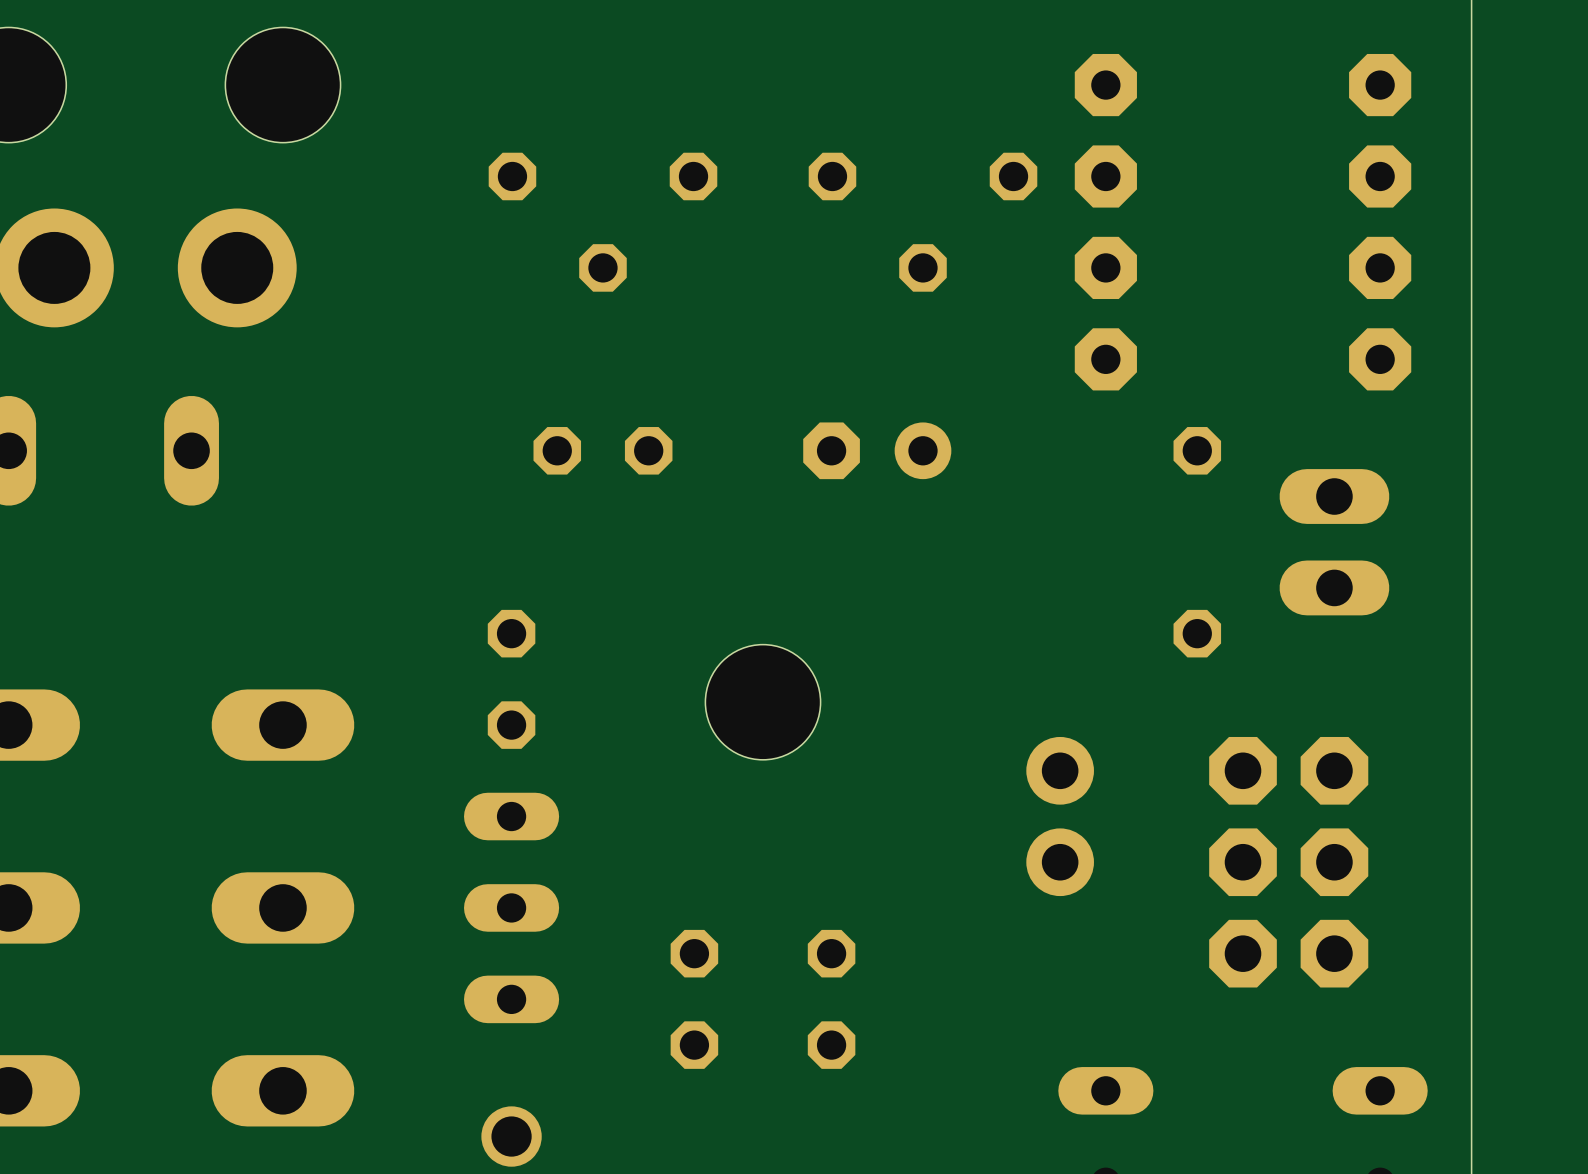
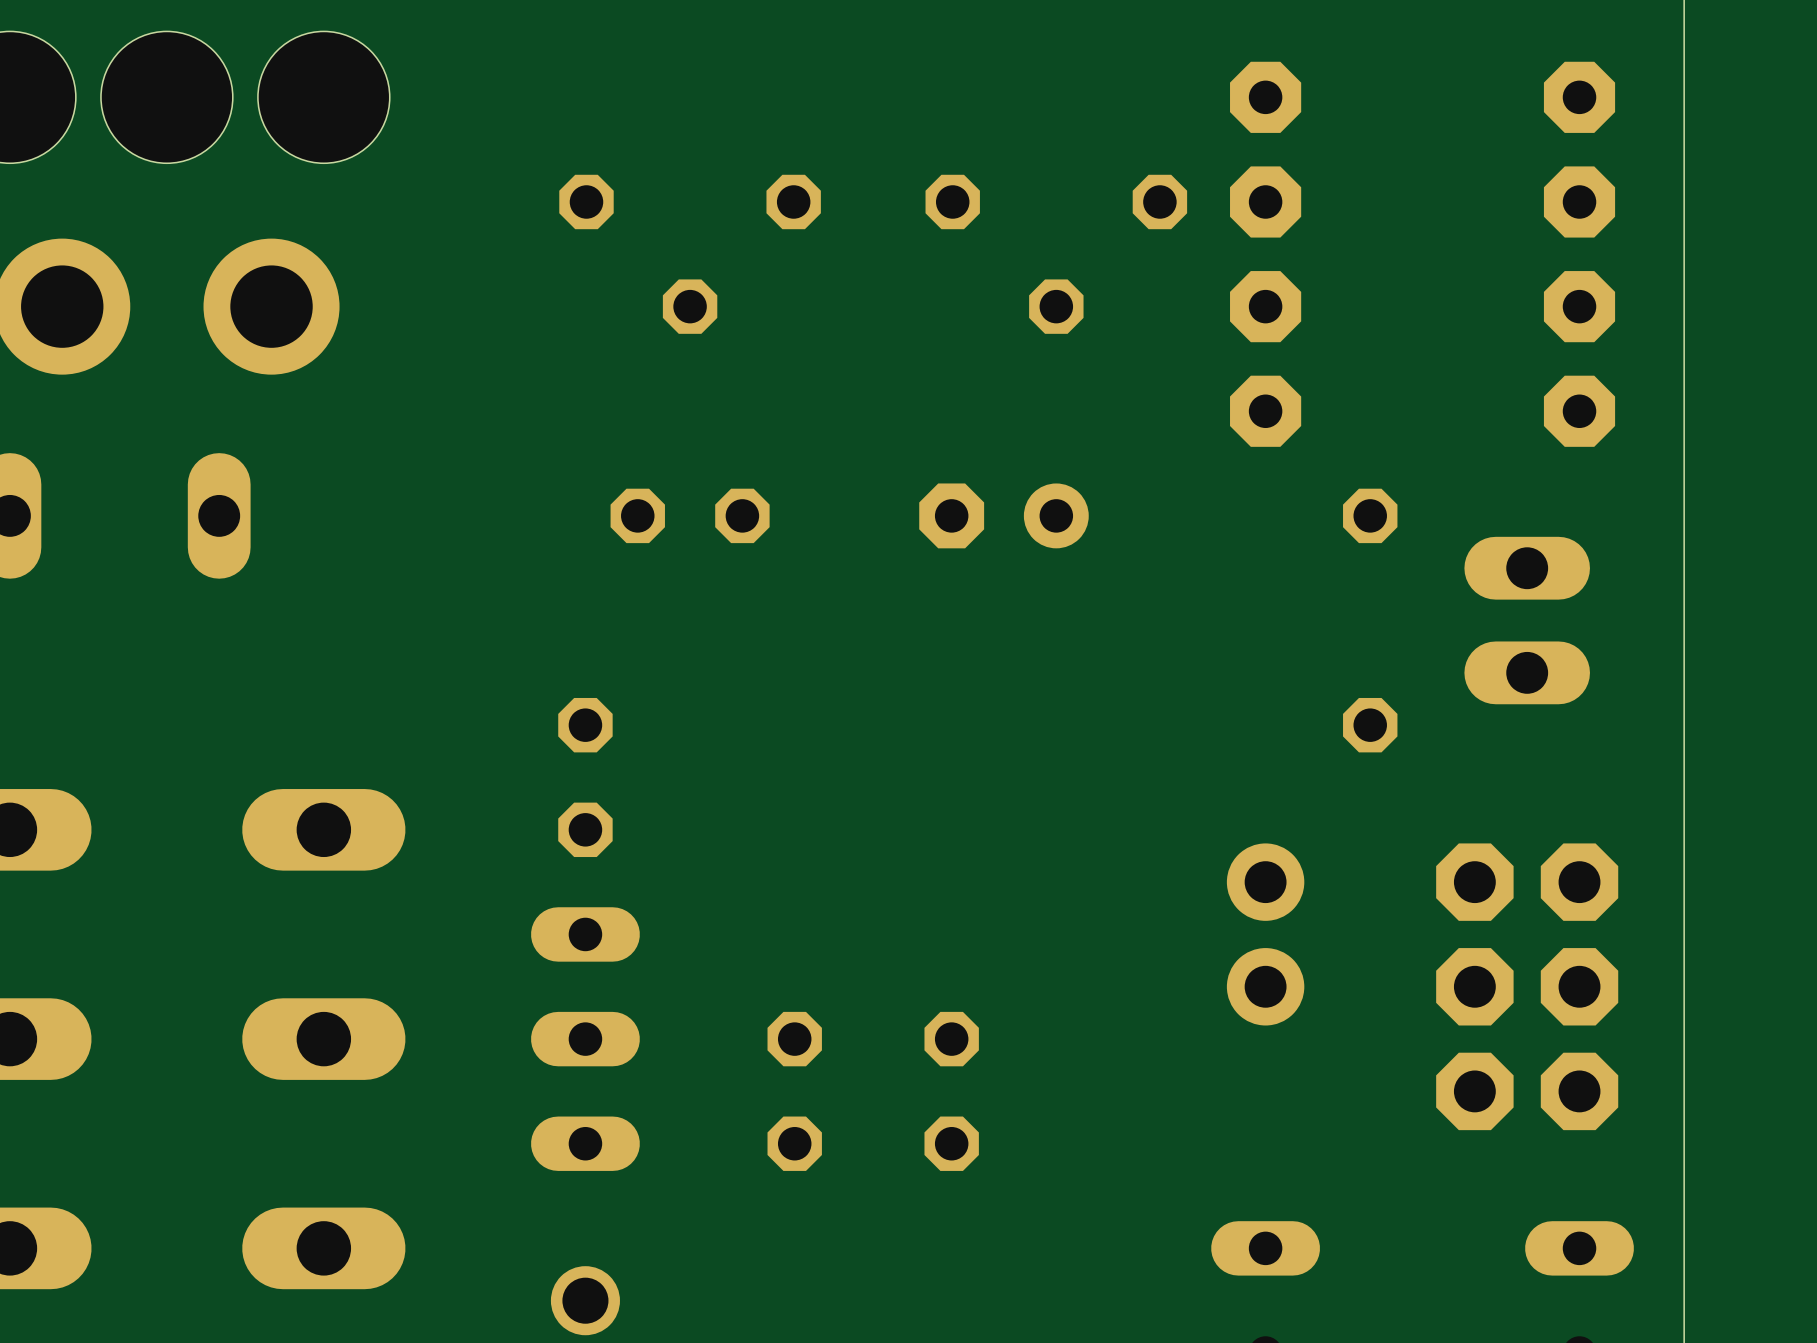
hole position: (762, 702) -> (166, 97)
part position: (1060, 816) -> (1265, 934)
part position: (1288, 862) -> (1527, 986)
part position: (694, 999) -> (794, 1091)
part position: (831, 999) -> (951, 1091)

